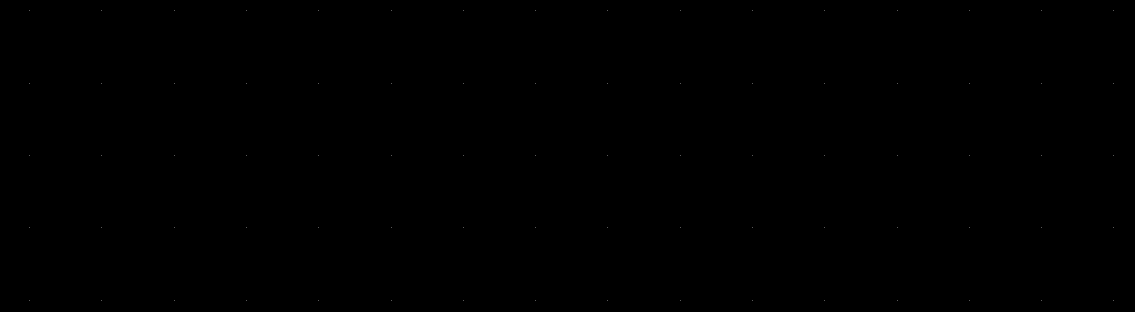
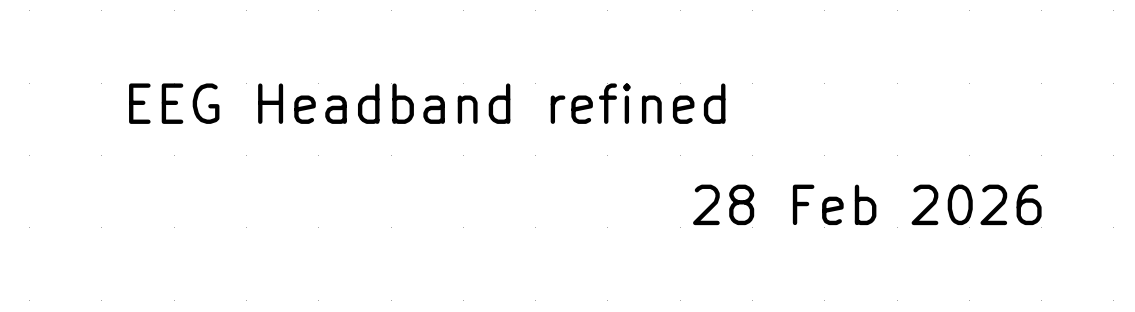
text: none -> EEG Headband refined (427, 103)
text: none -> 28 Feb 2026 (867, 204)

